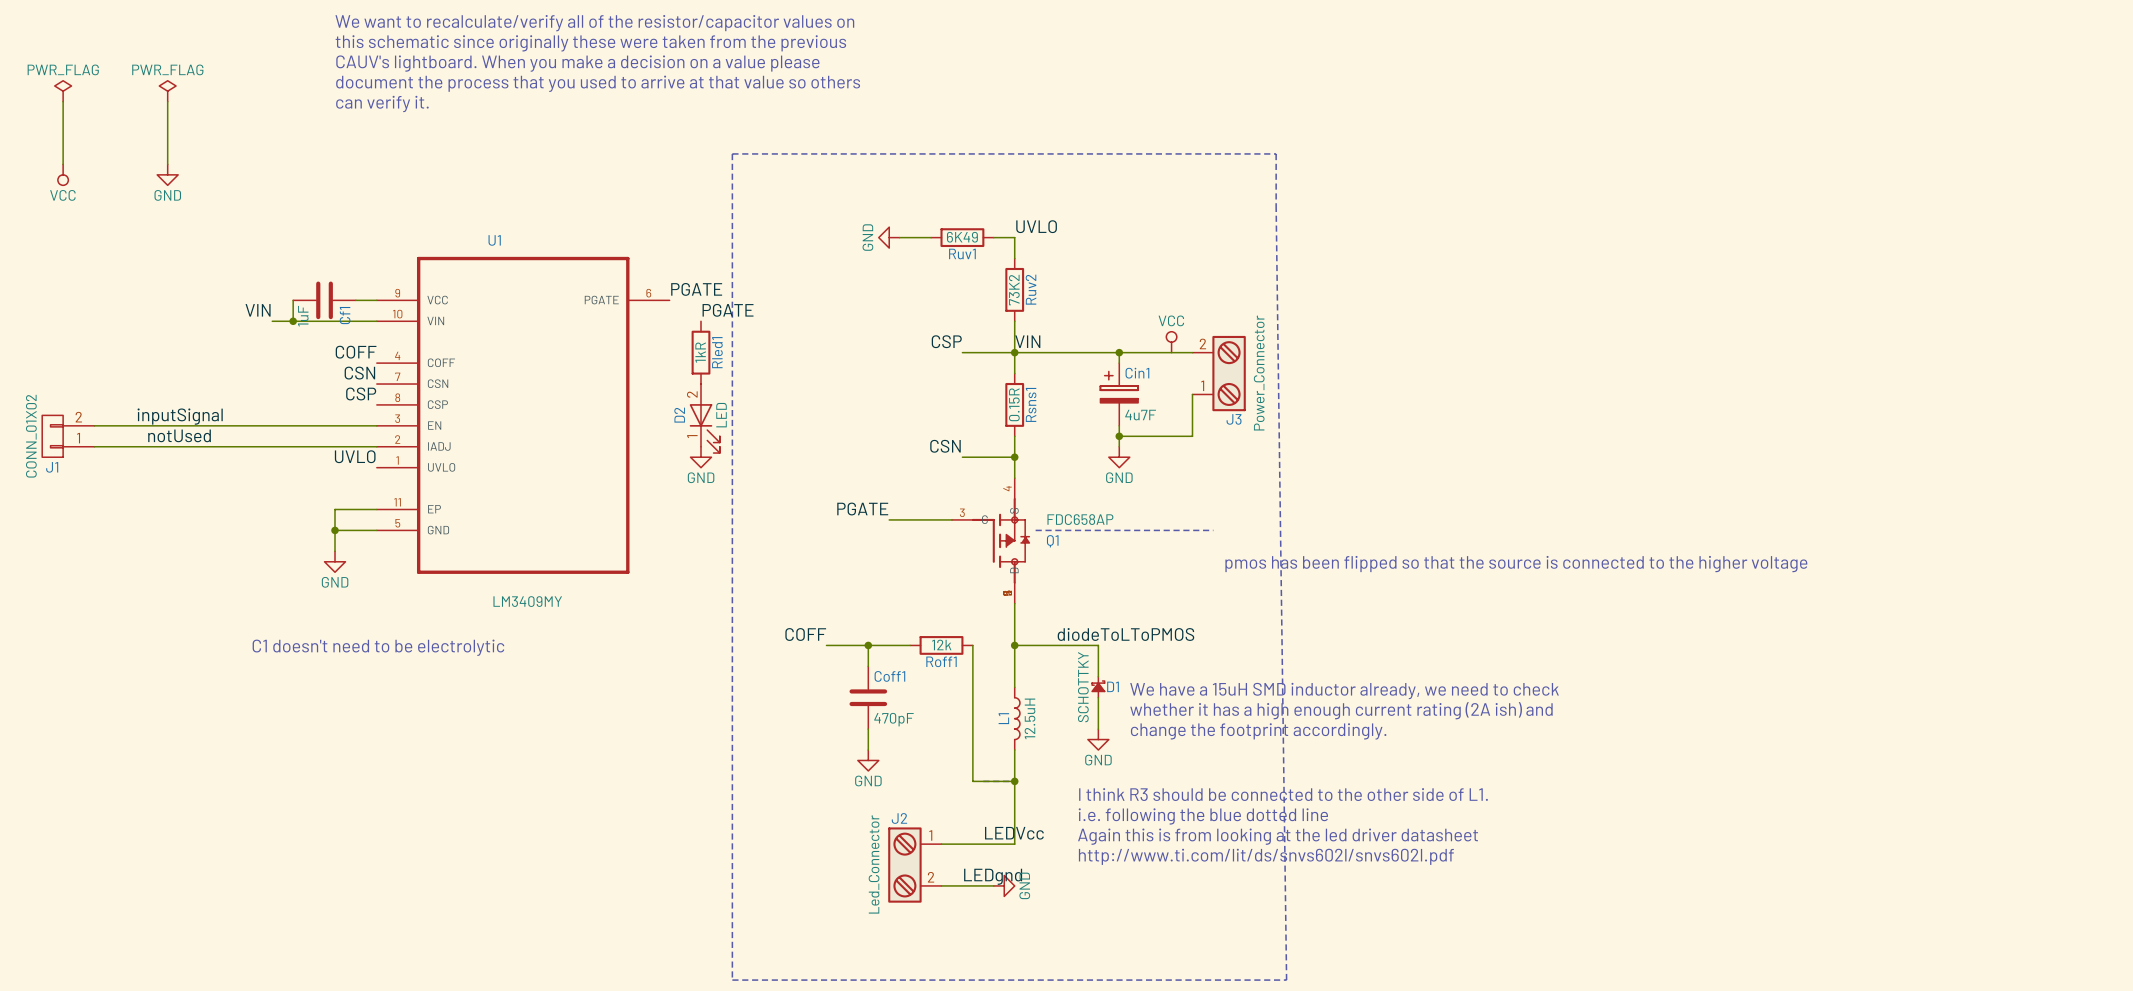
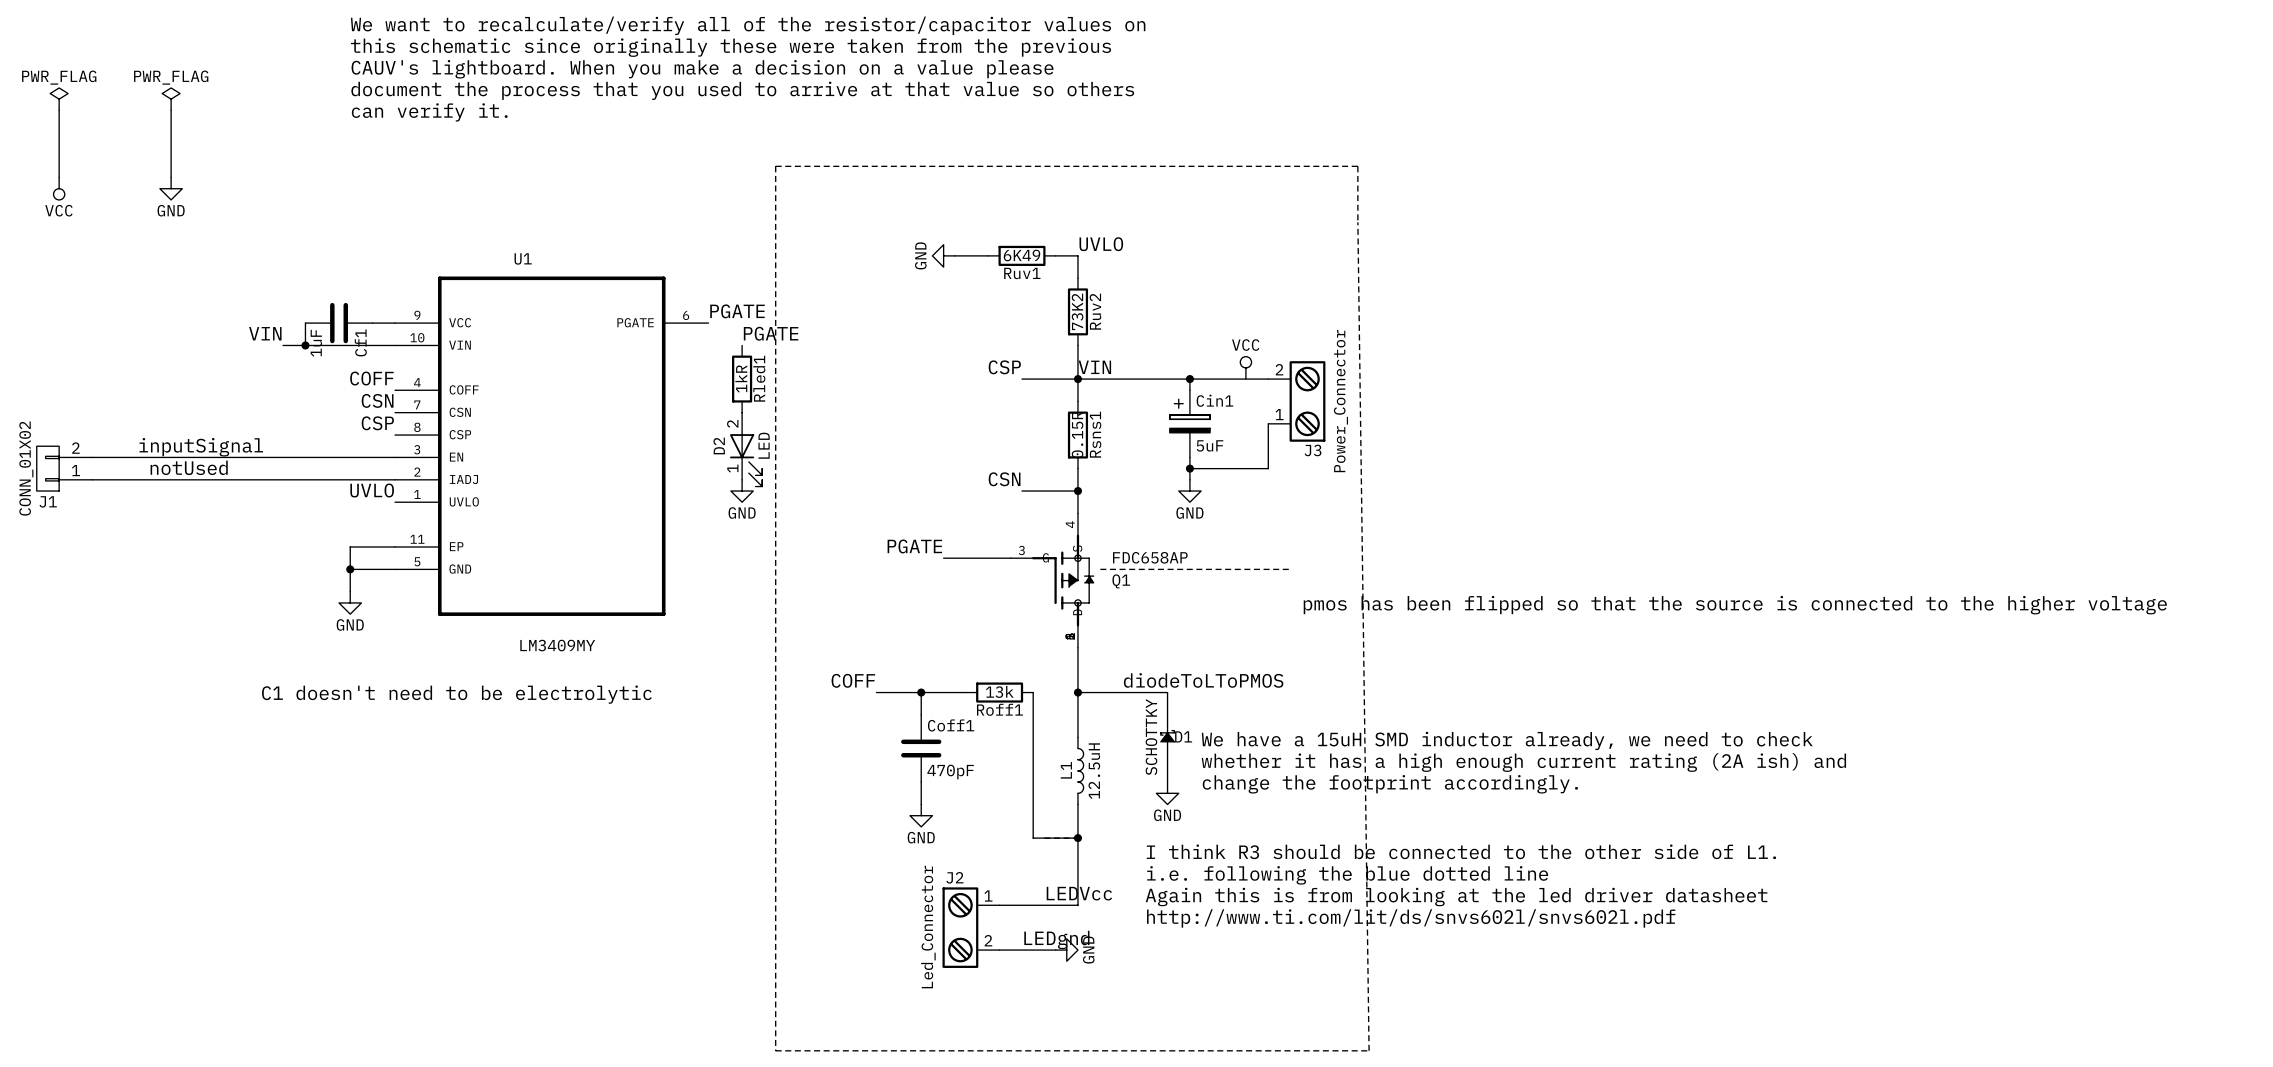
Cin1 value: 4u7F (1140, 415) -> 5uF (1209, 445)
Roff1 value: 12k (941, 644) -> 13k (999, 691)

